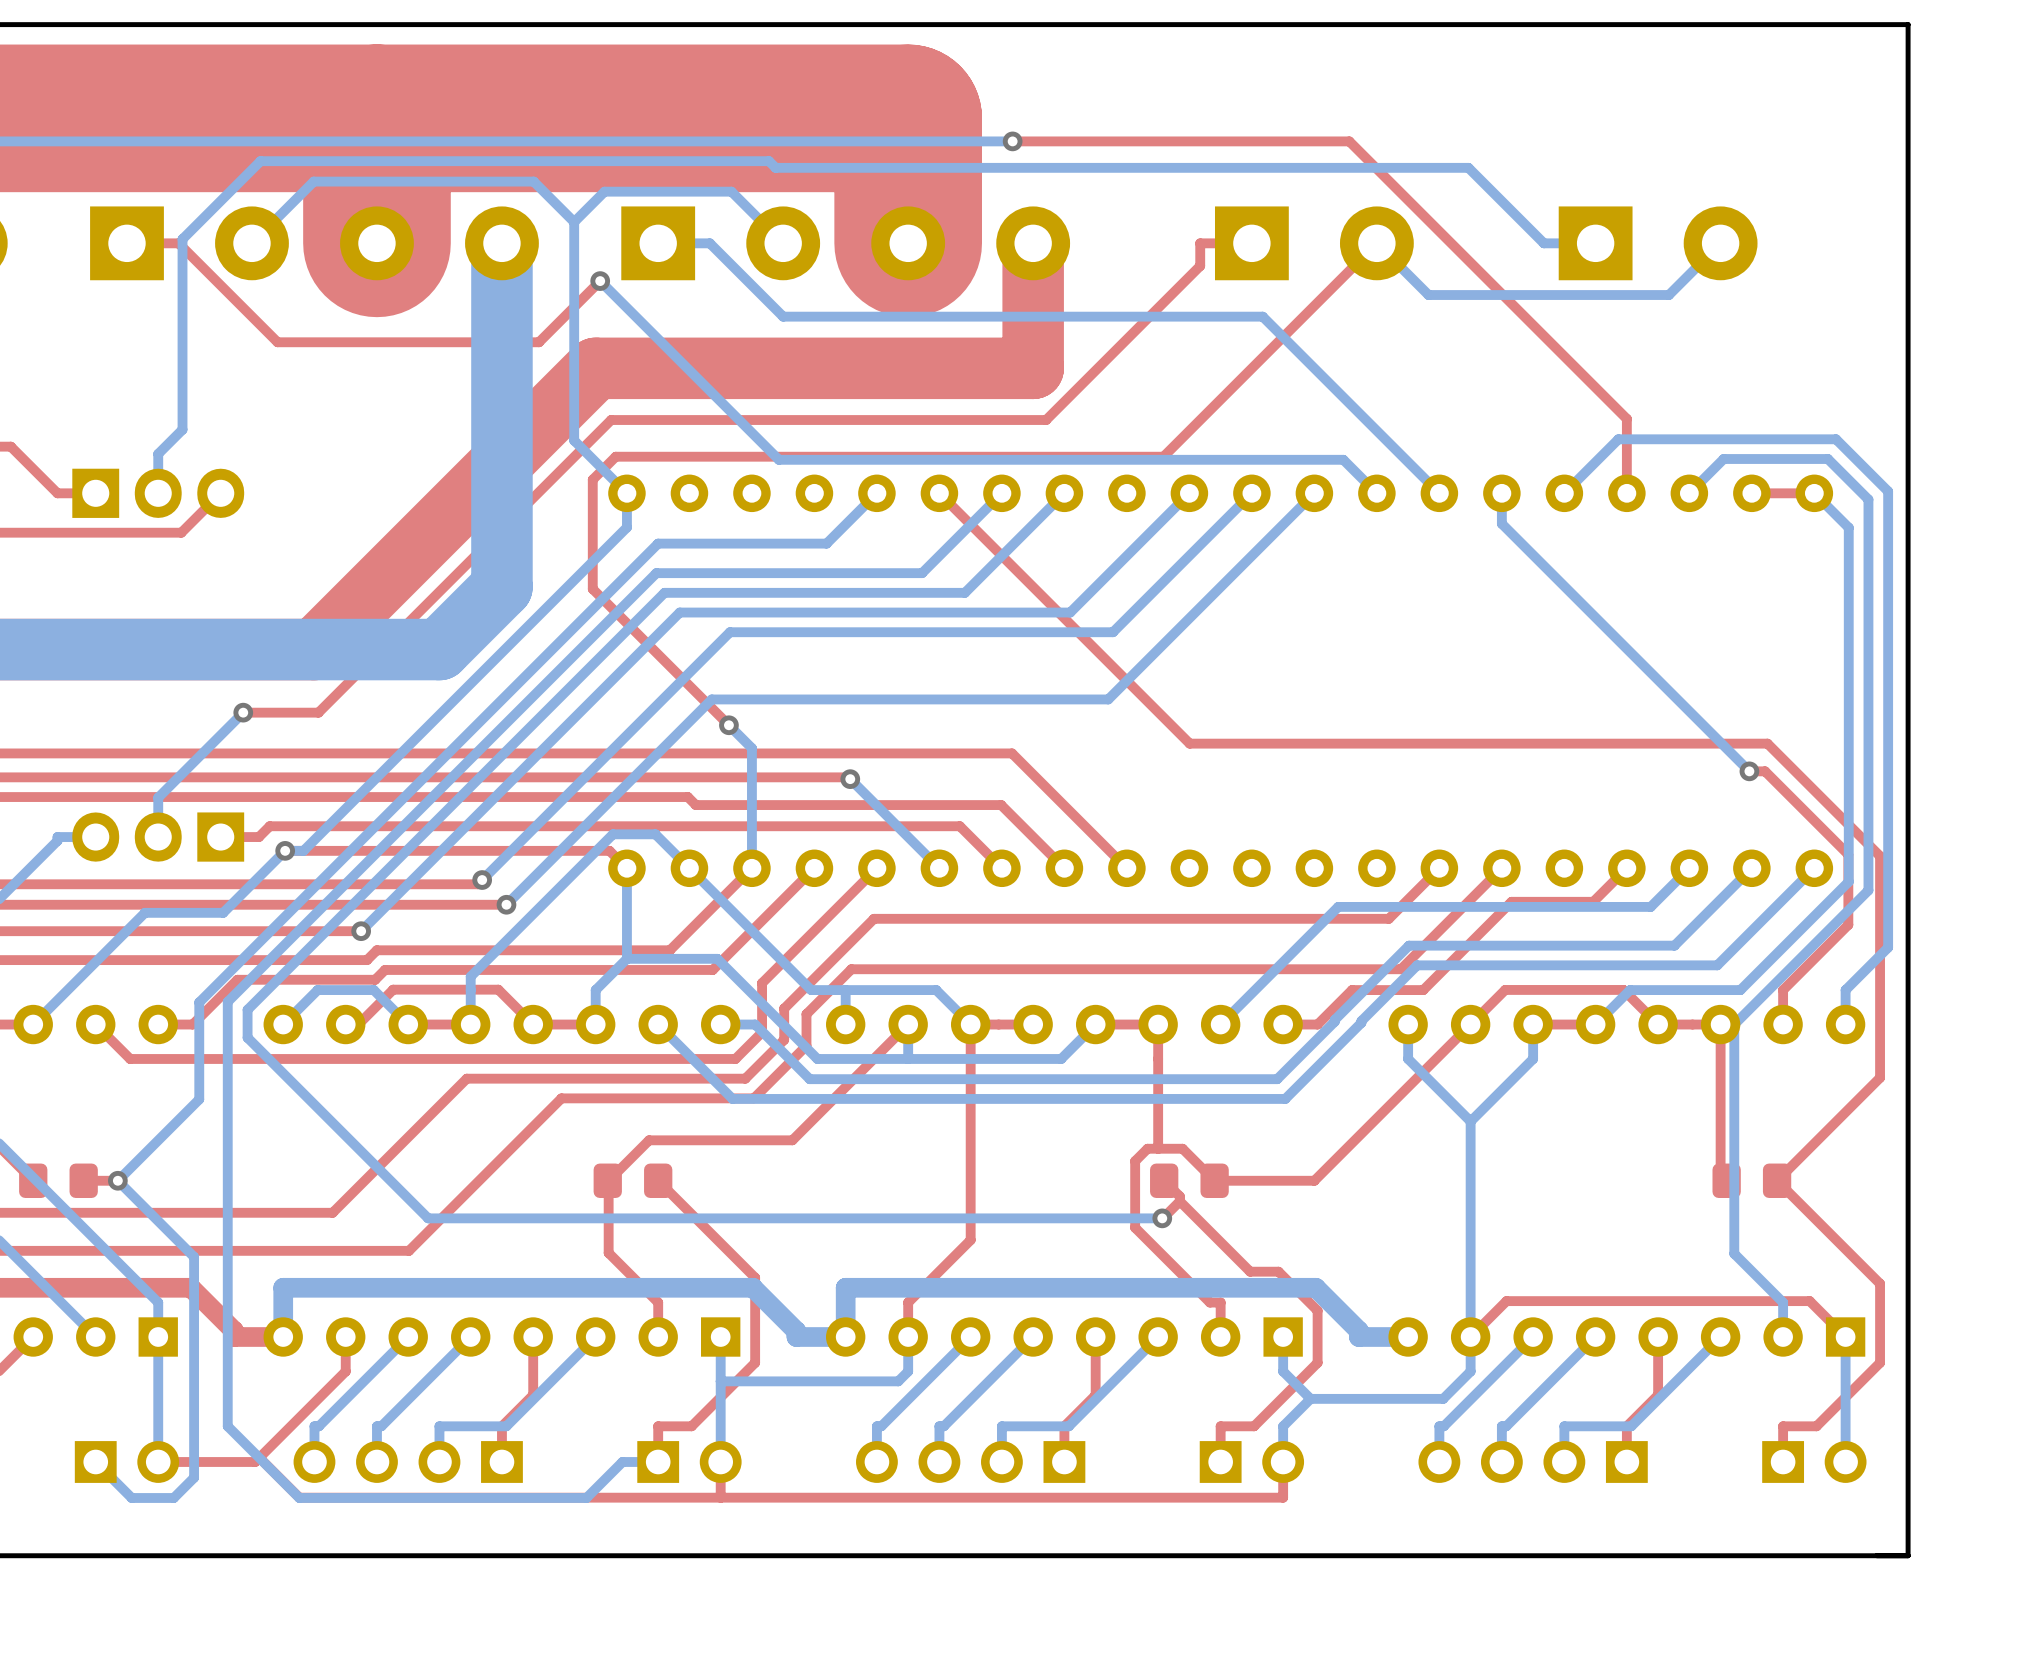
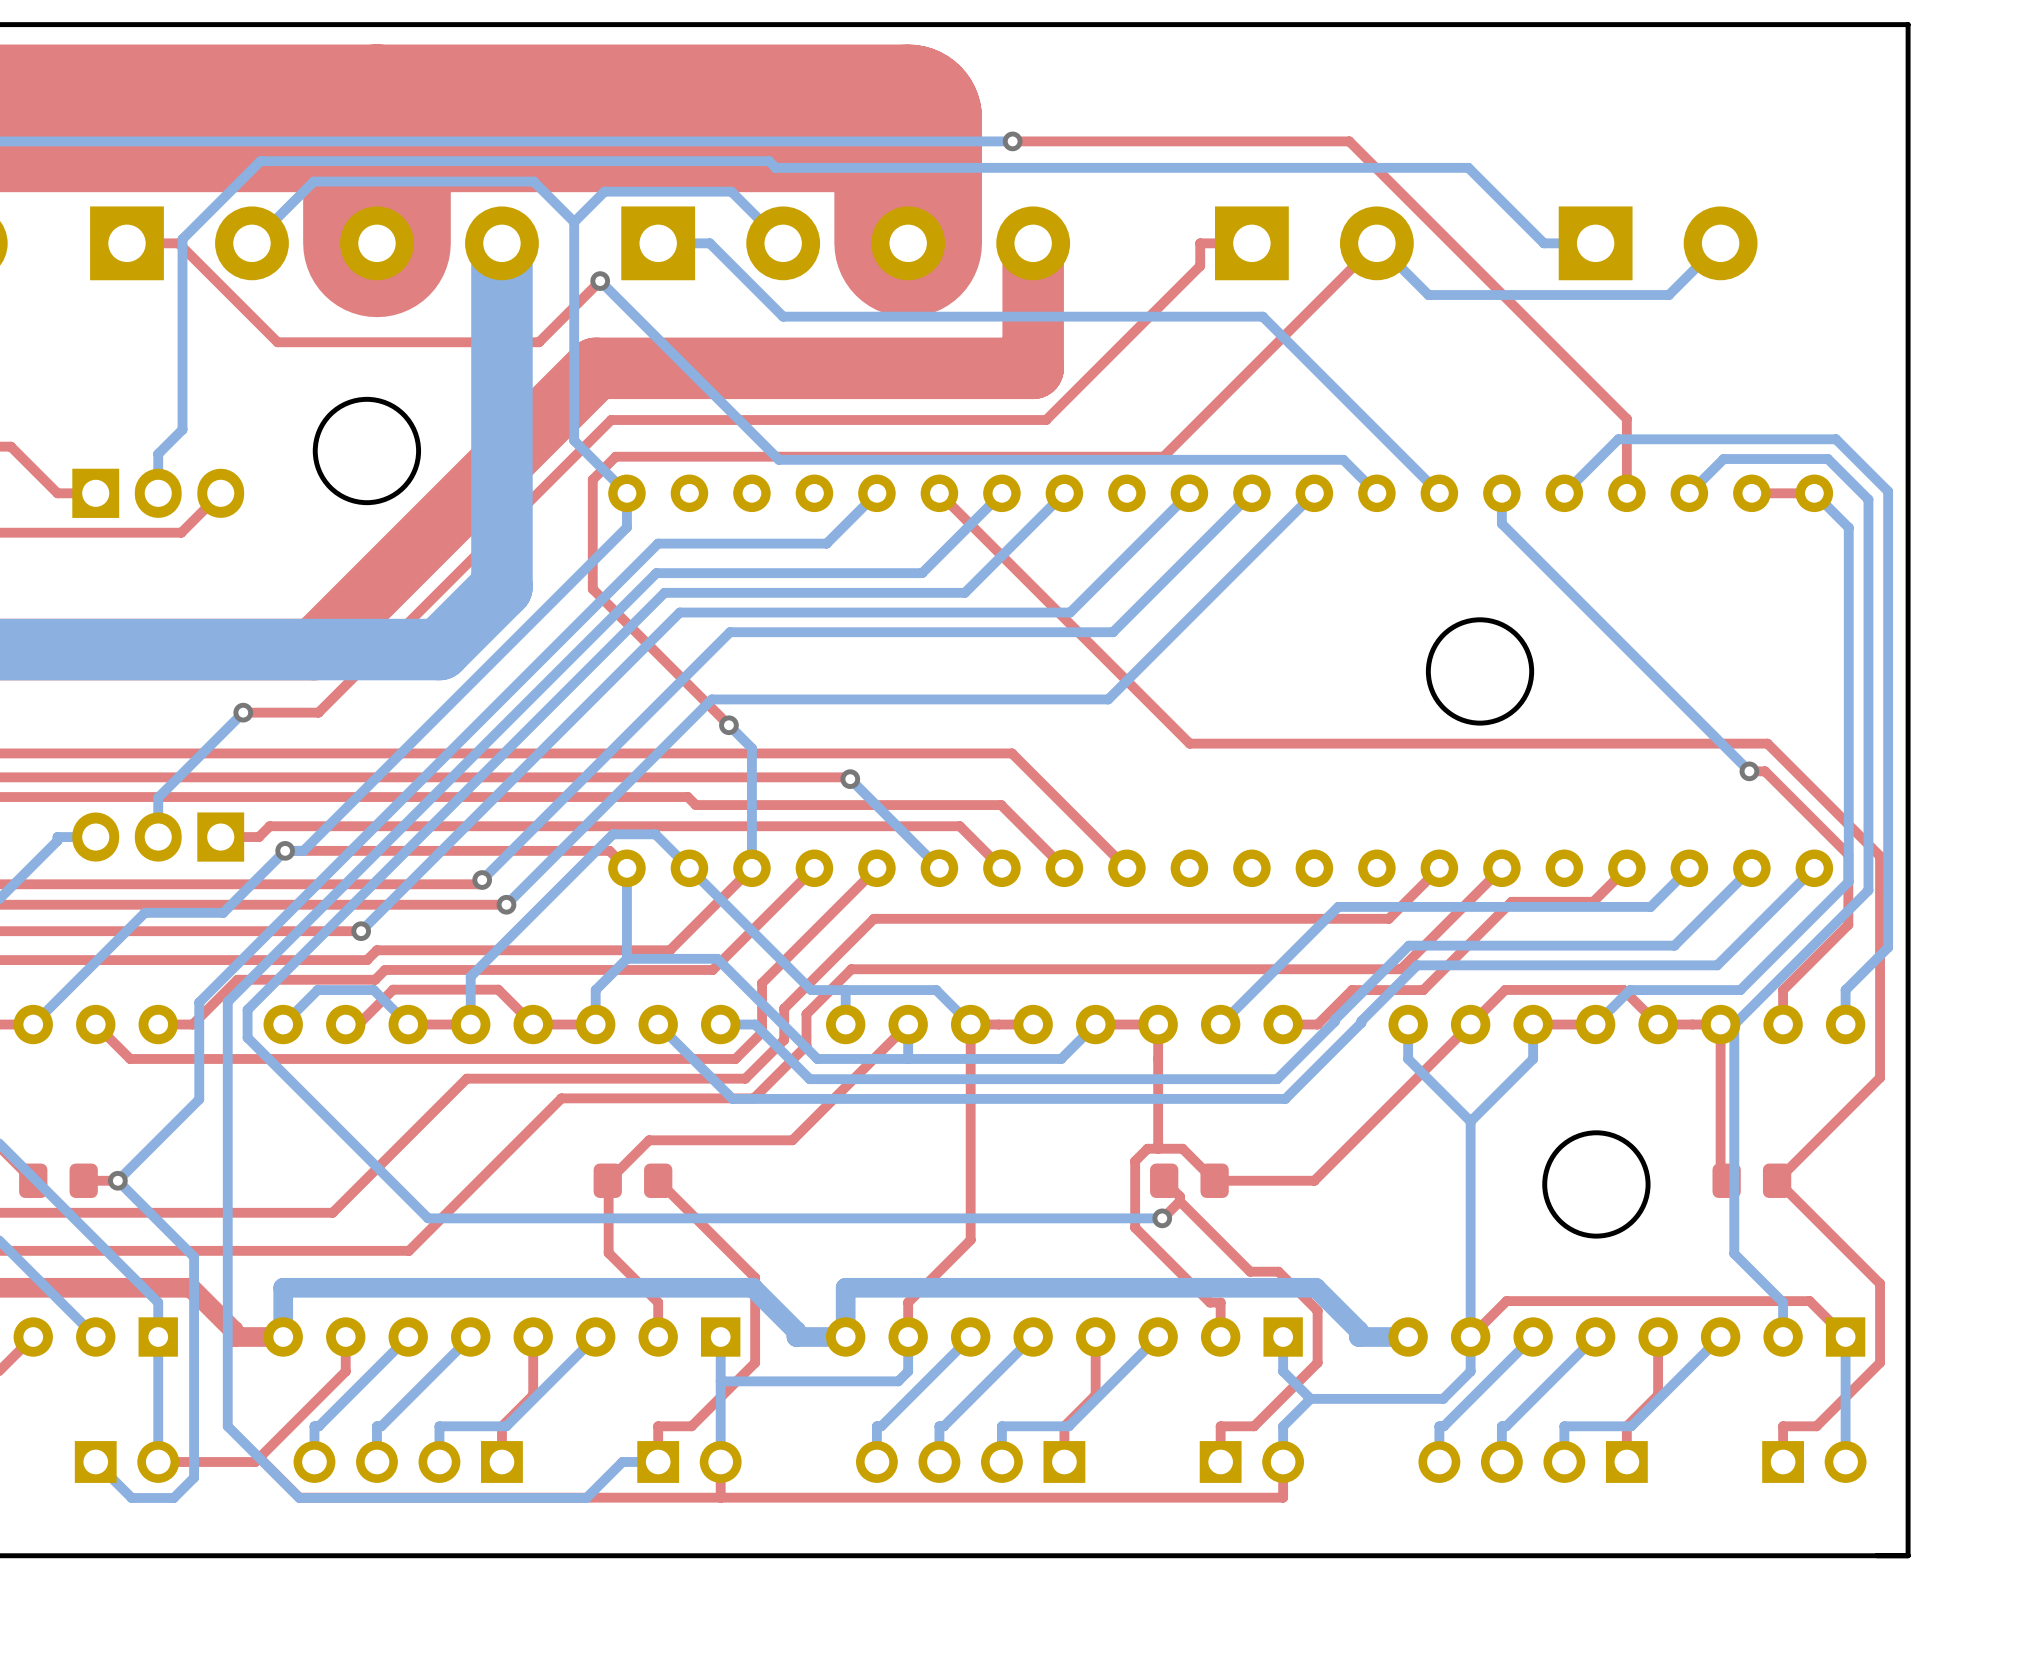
round board edge: none -> [312, 396, 422, 506]
round board edge: none -> [1425, 617, 1535, 726]
round board edge: none -> [1542, 1130, 1651, 1239]

